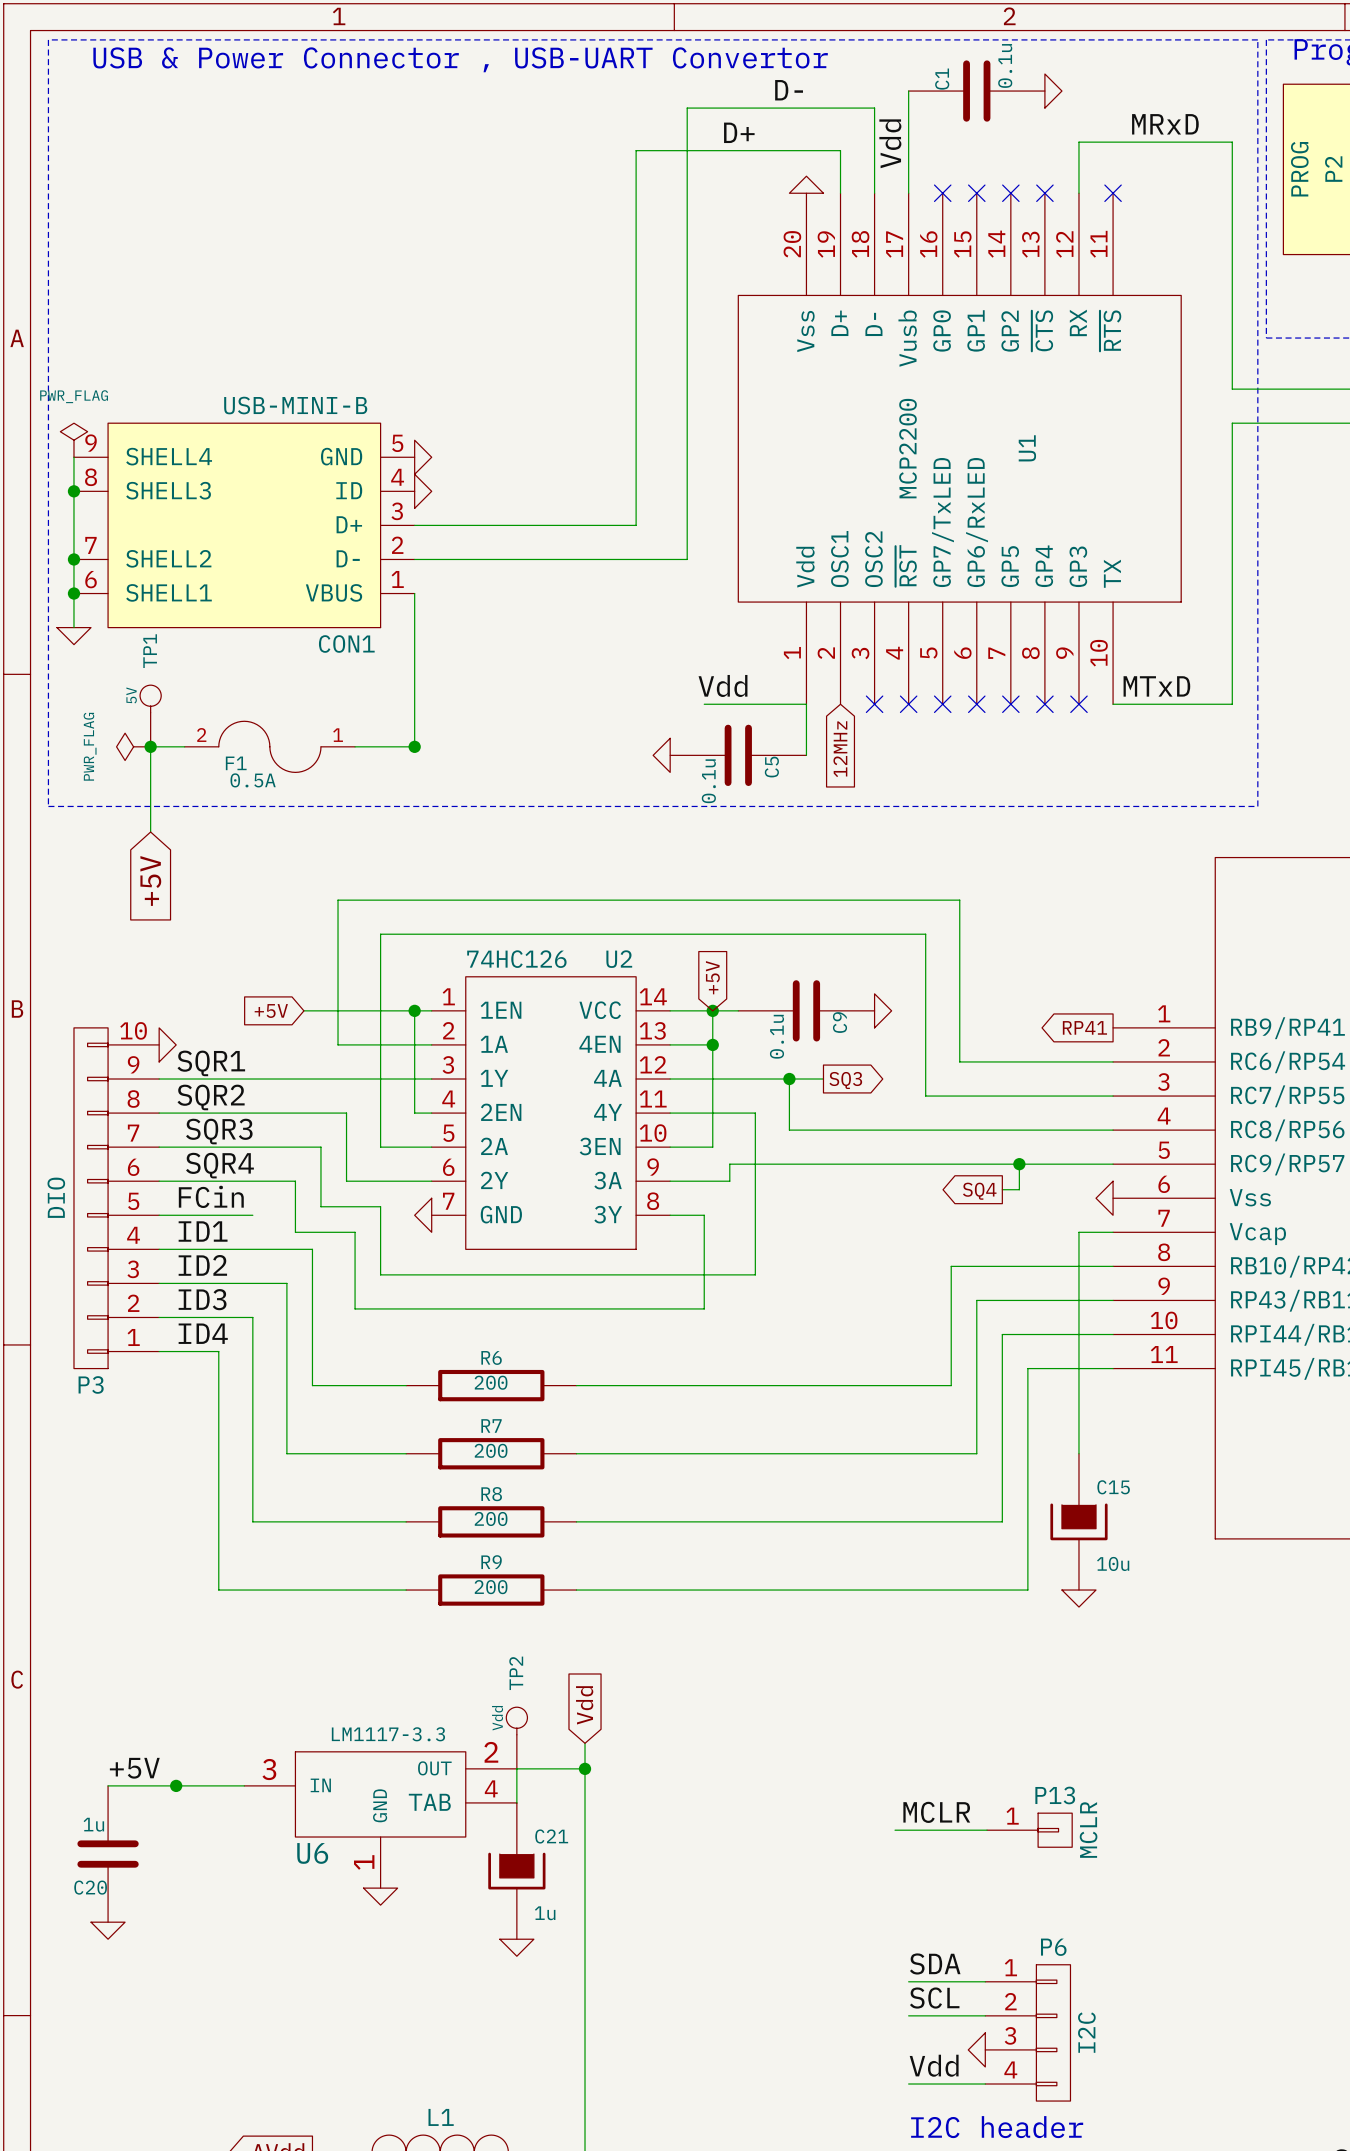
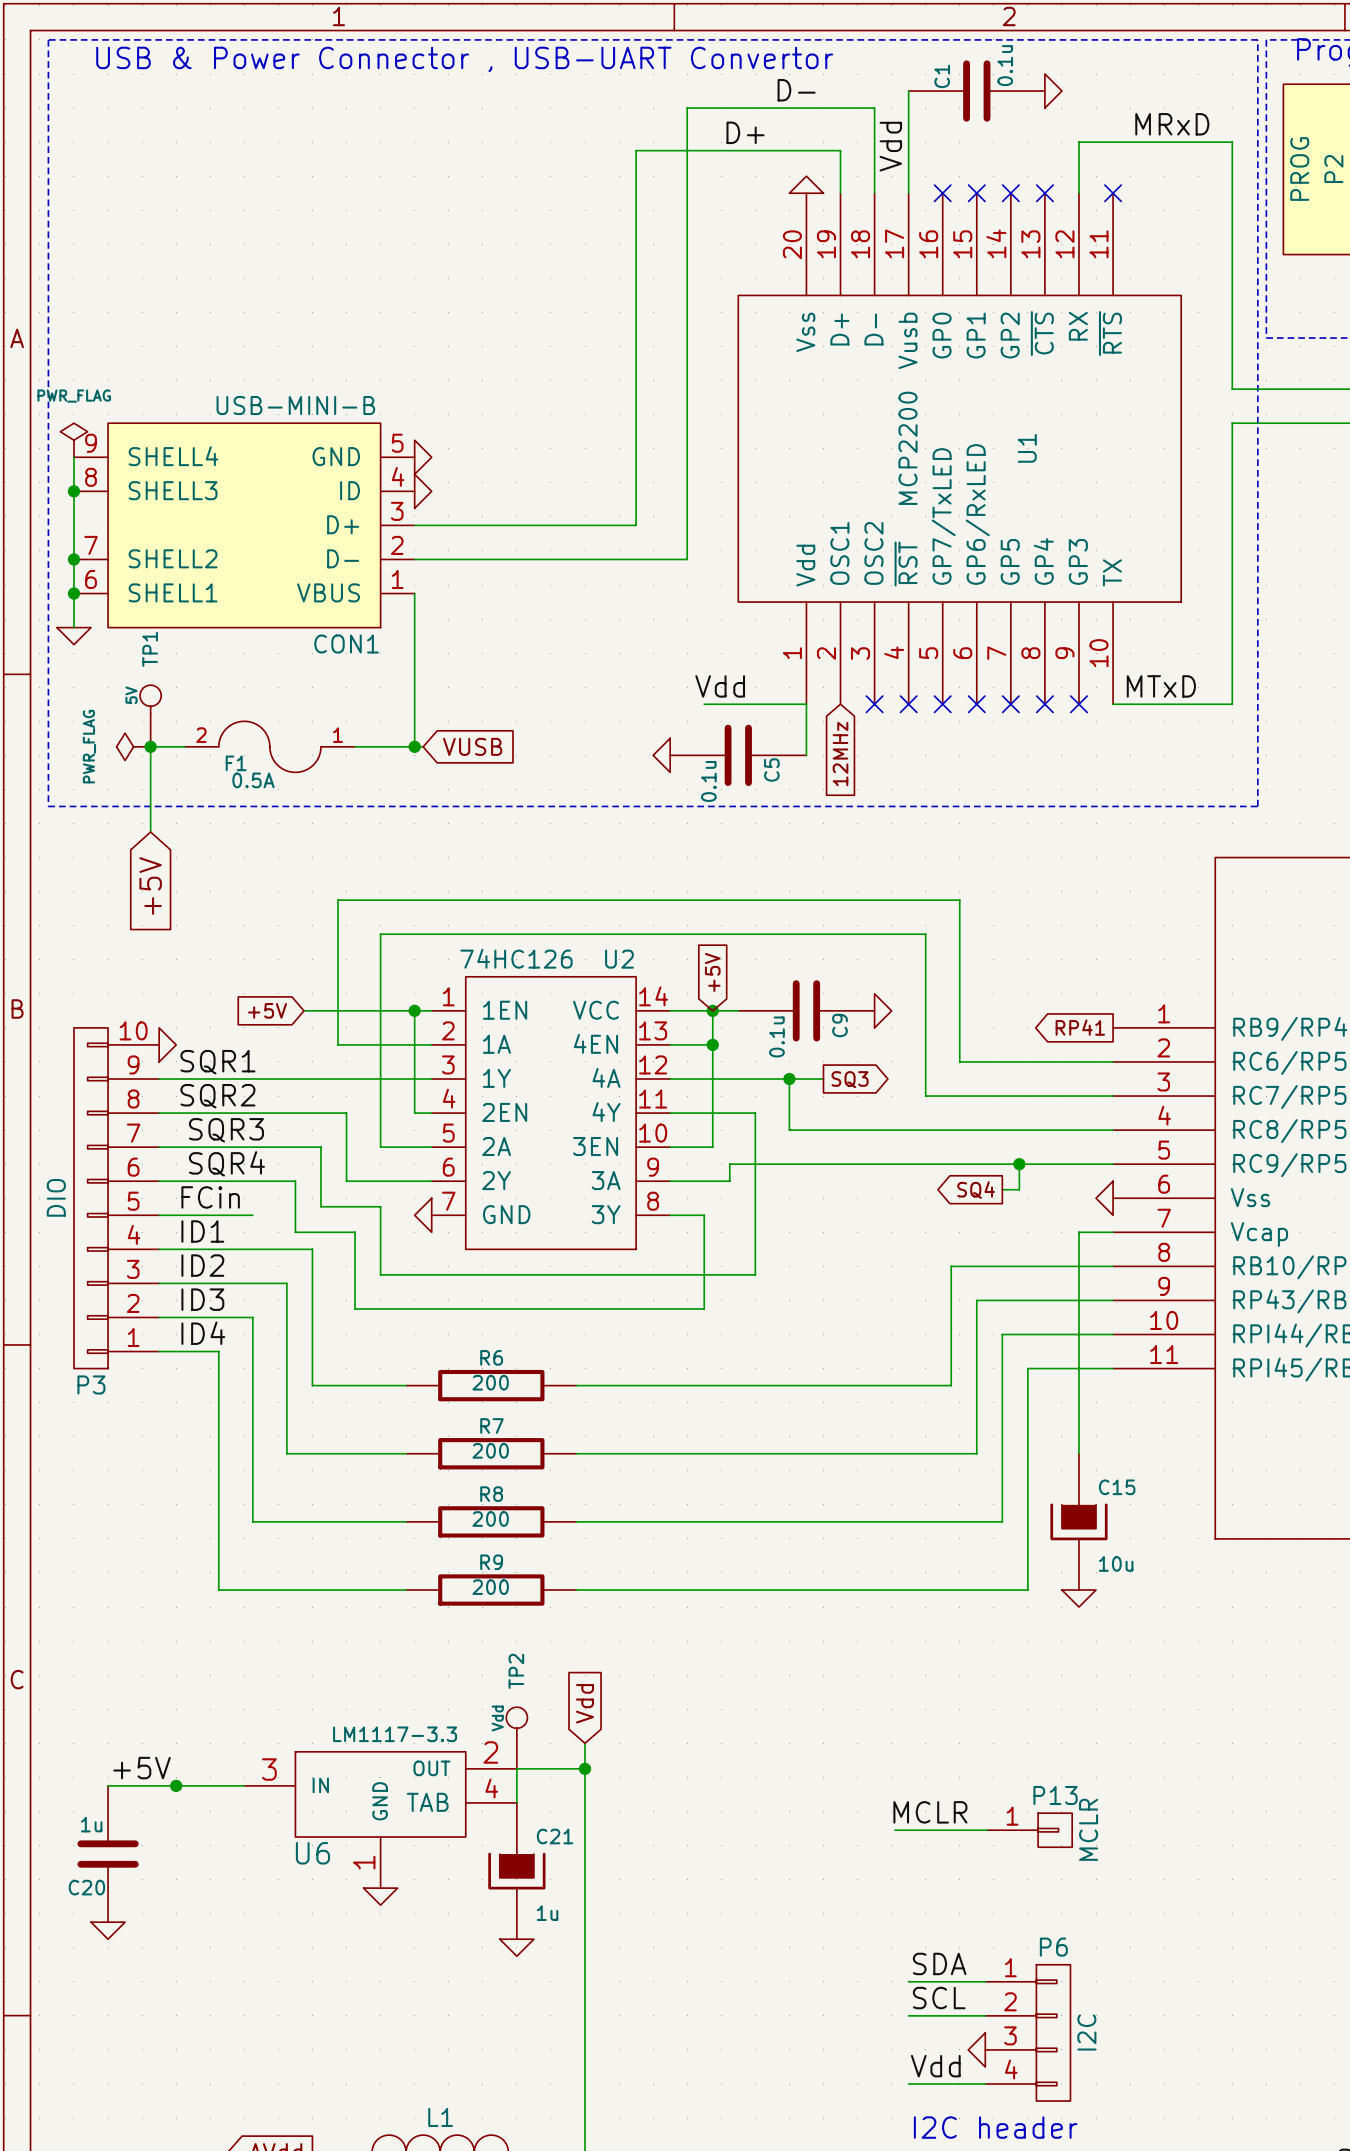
global label: none -> VUSB (472, 746)

